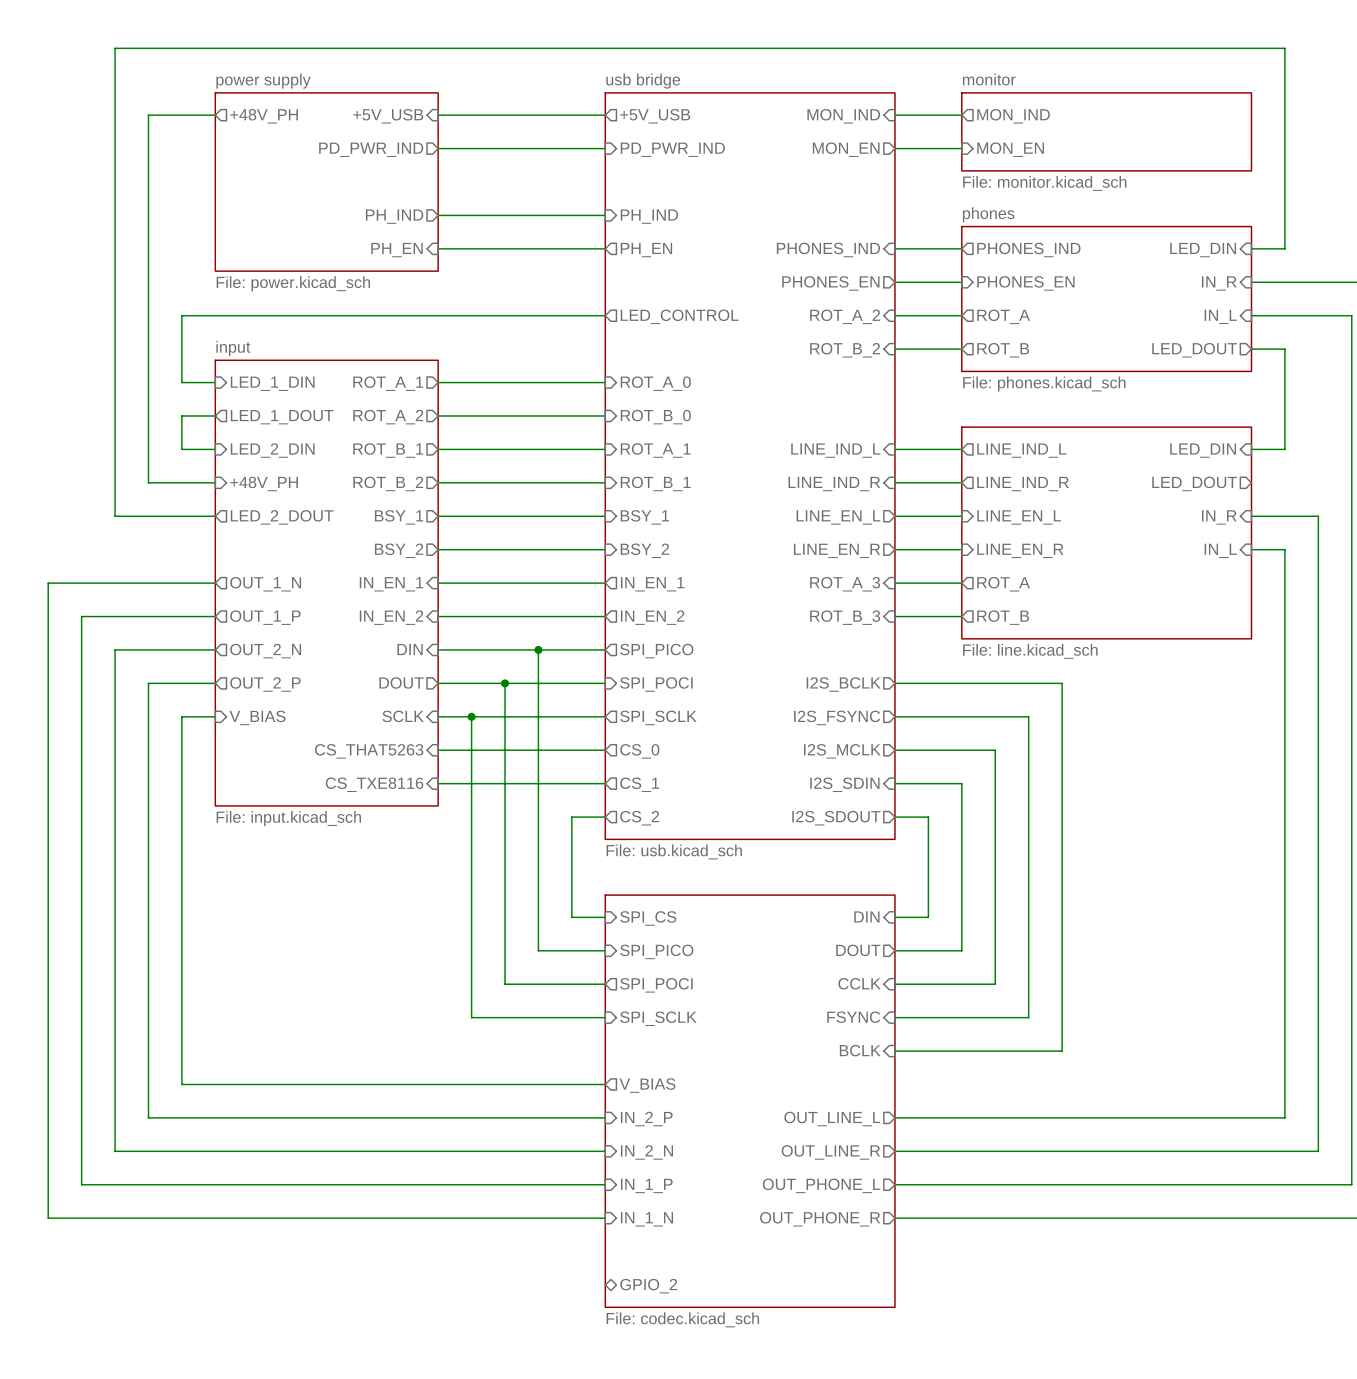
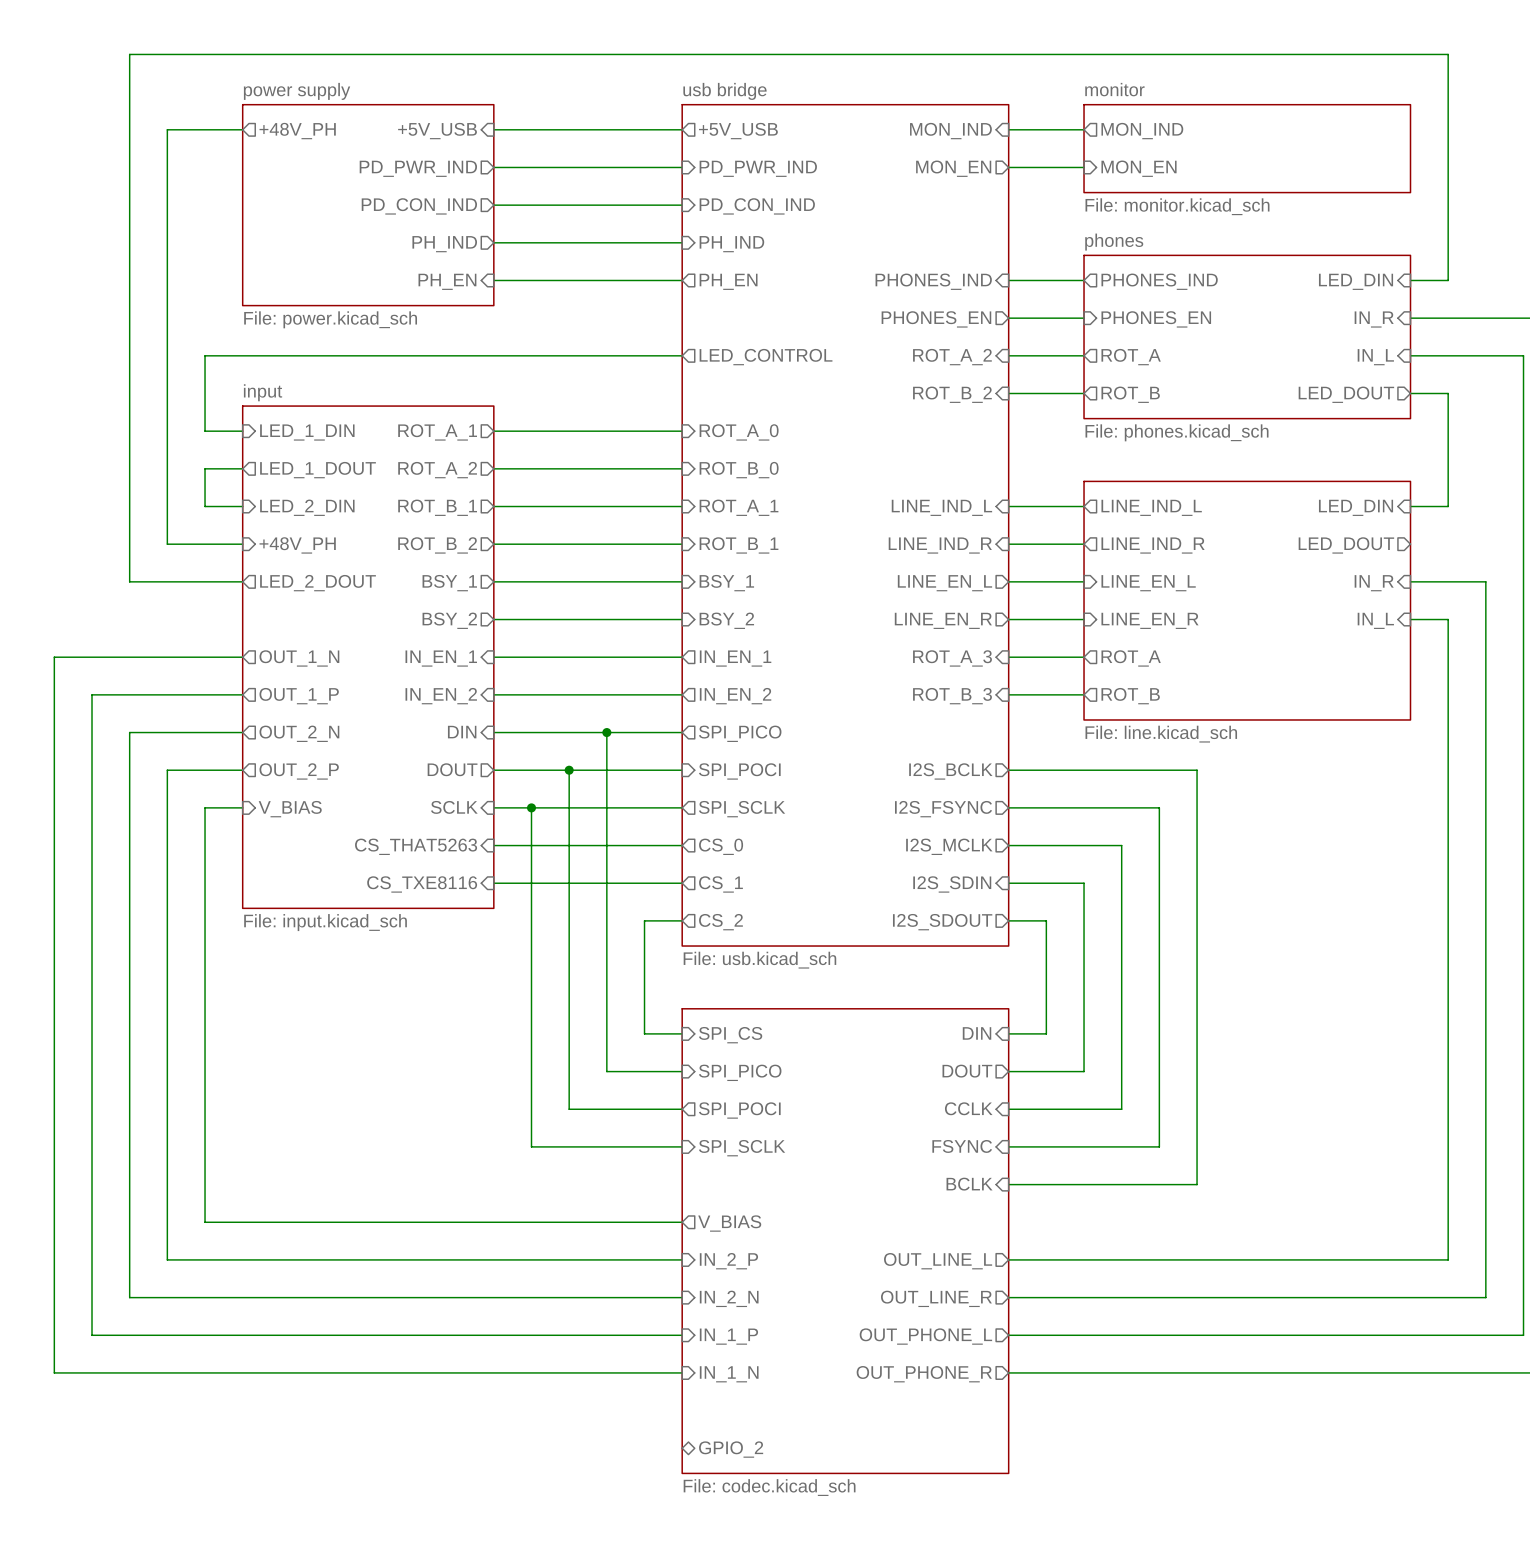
wire: none -> (493, 205) (682, 205)
sheet pin: none -> PD_CON_IND (419, 206)
sheet pin: none -> PD_CON_IND (757, 206)

